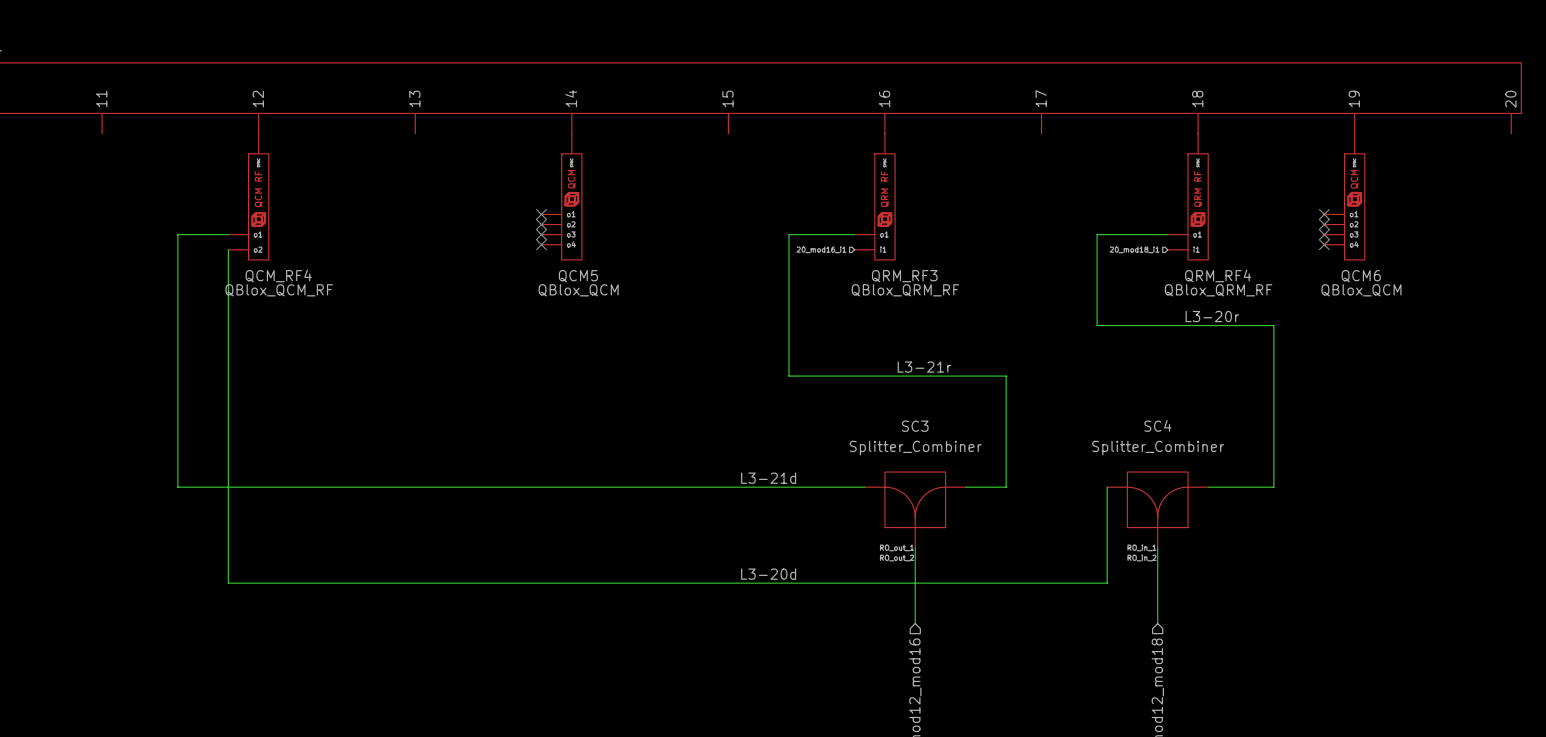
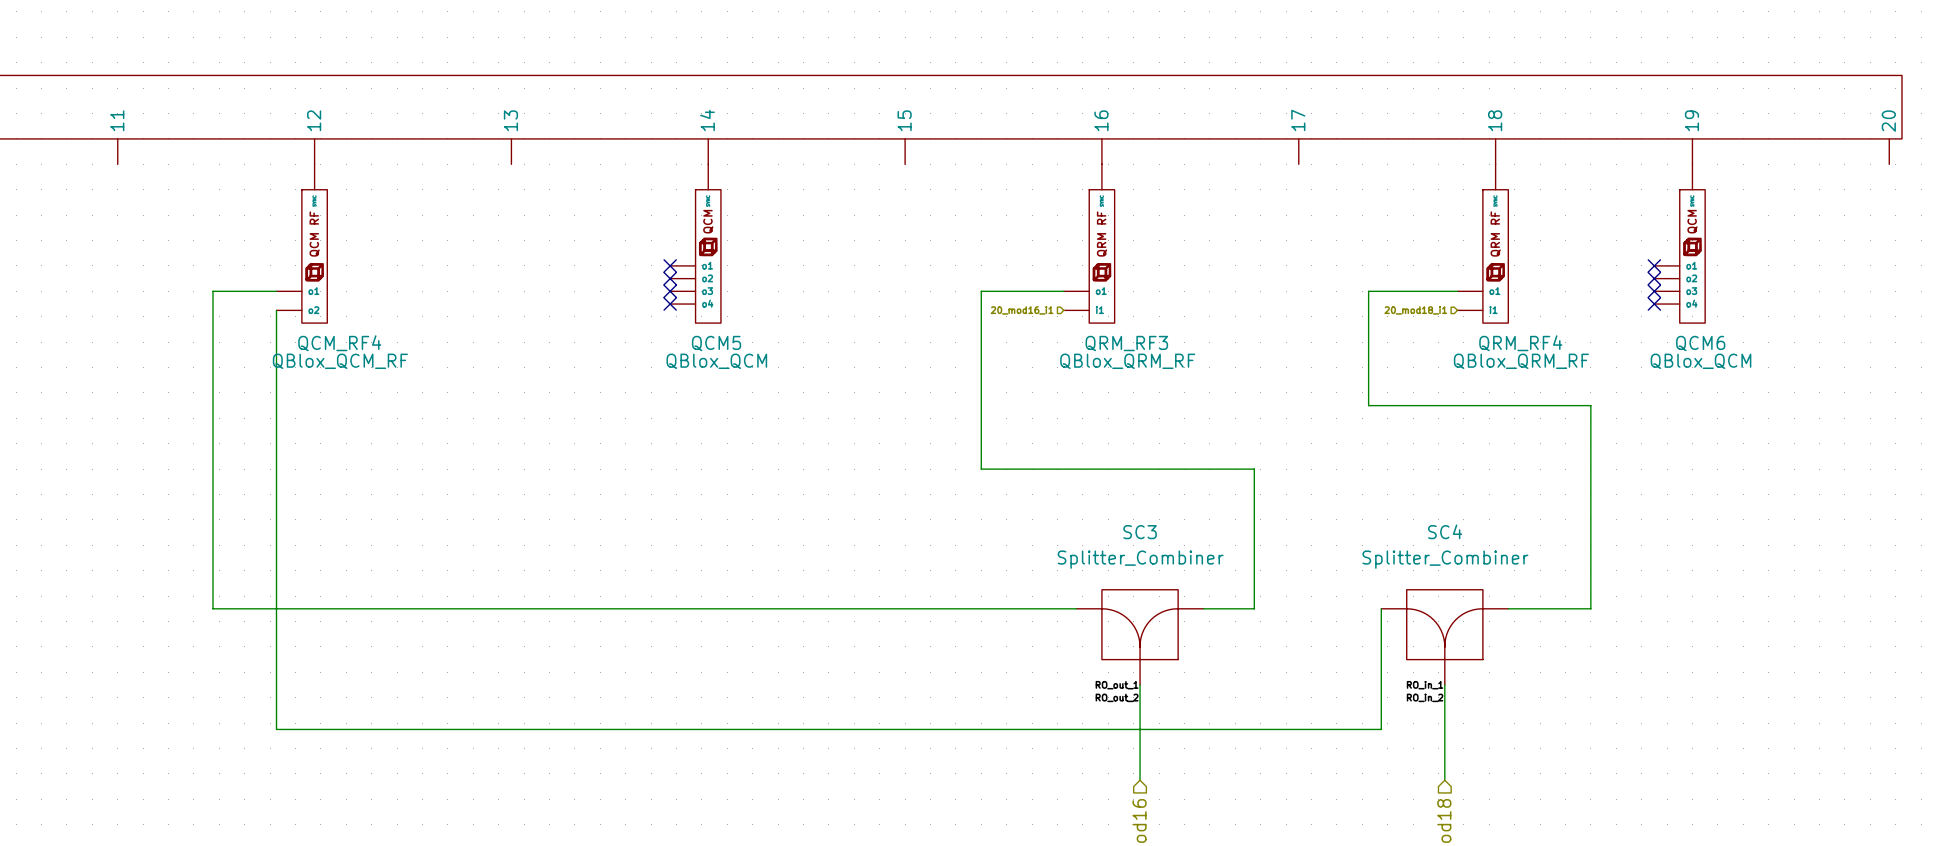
label: L3-20r (1212, 316) -> none
label: L3-21r (924, 367) -> none
label: L3-21d (768, 478) -> none
label: L3-20d (768, 574) -> none

